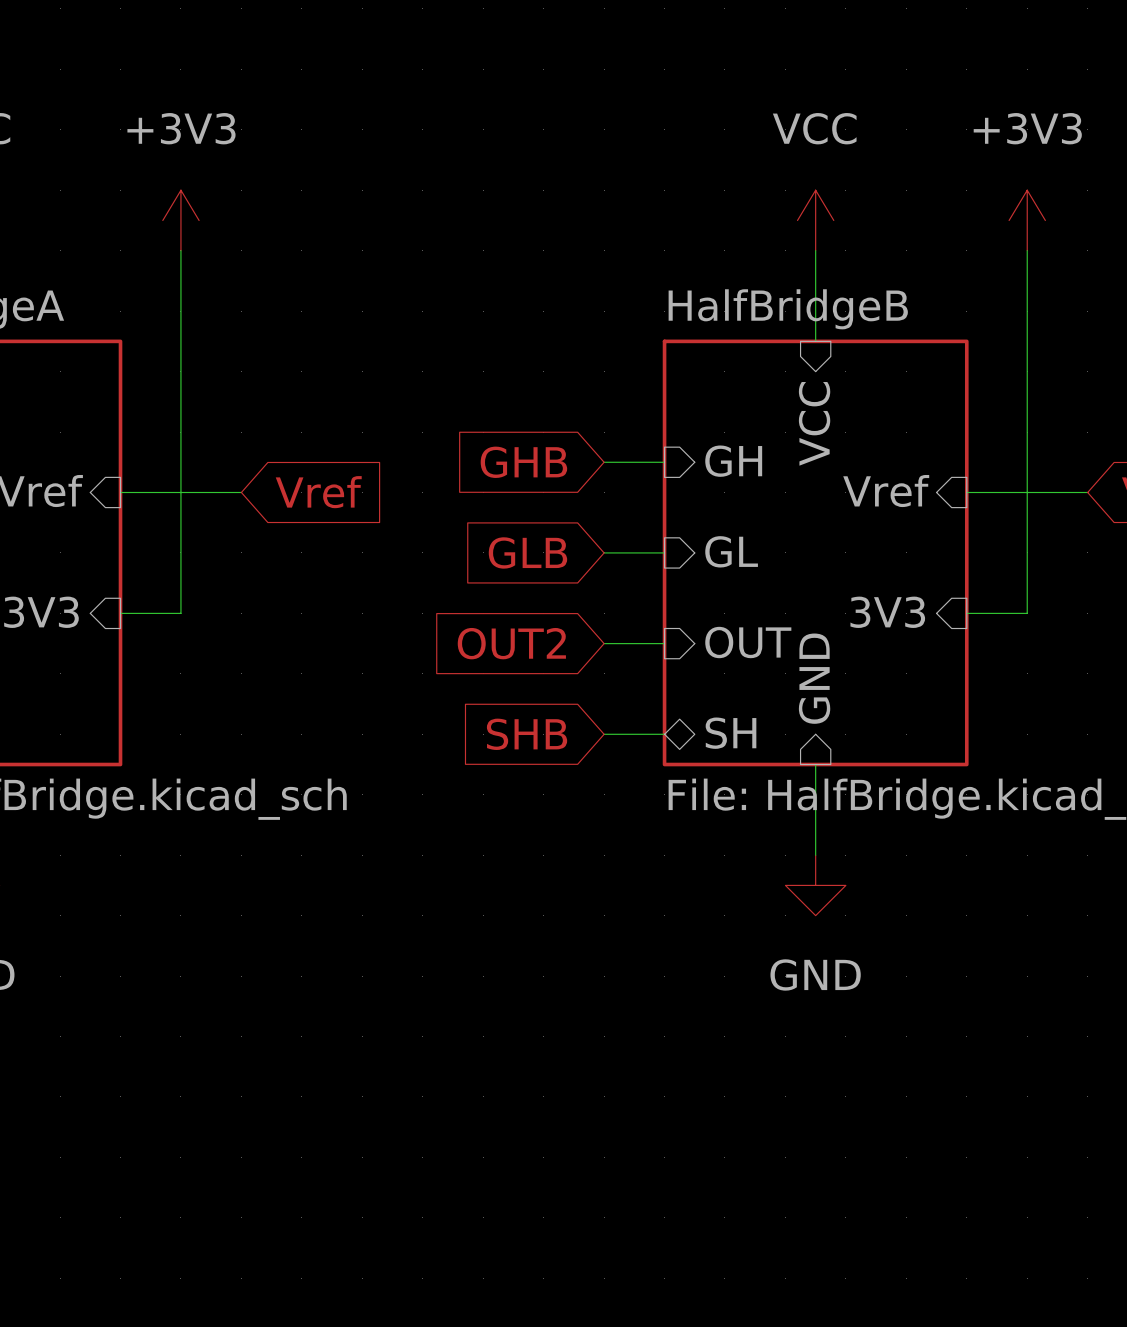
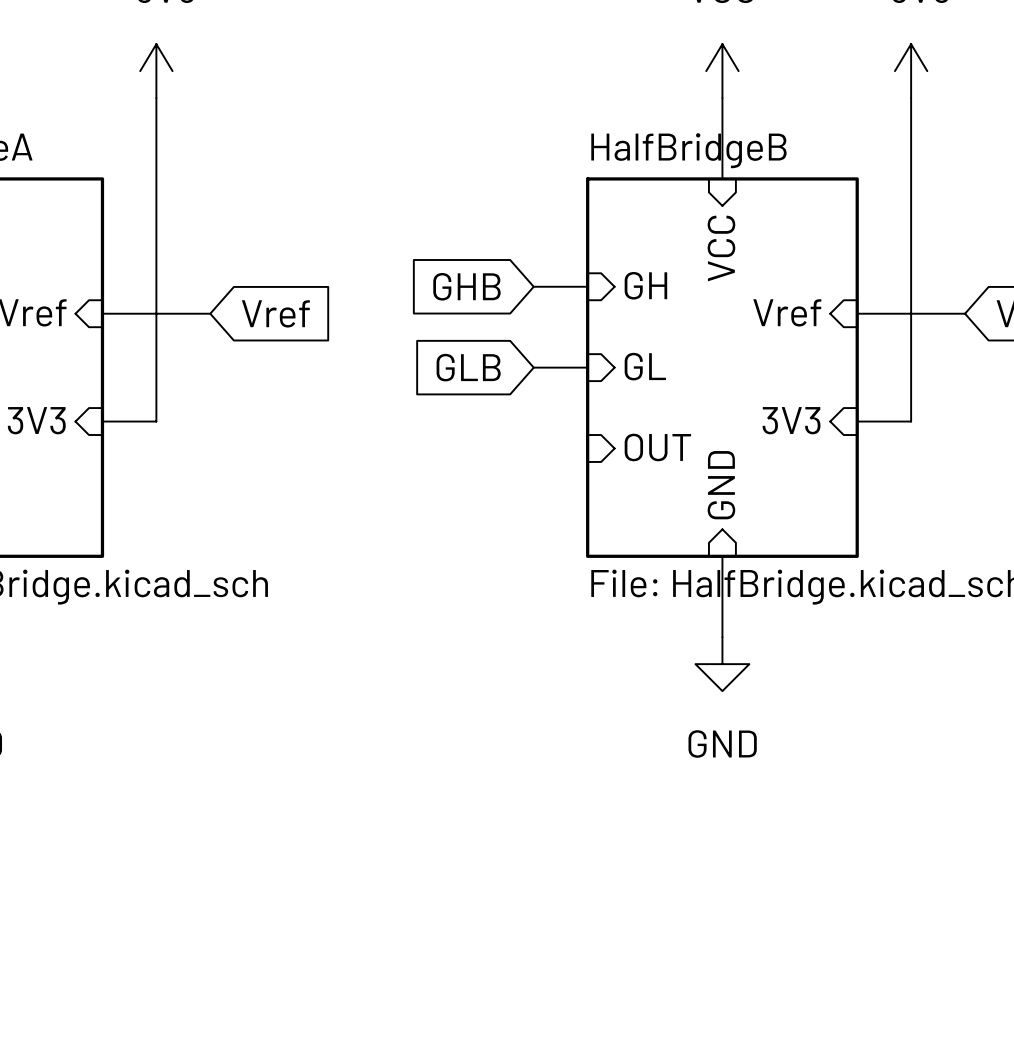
global label: OUT2 (511, 643) -> none
wire: (604, 643) (664, 643) -> none
sheet pin: SH (731, 733) -> none
global label: SHB (527, 734) -> none
wire: (604, 734) (664, 734) -> none

